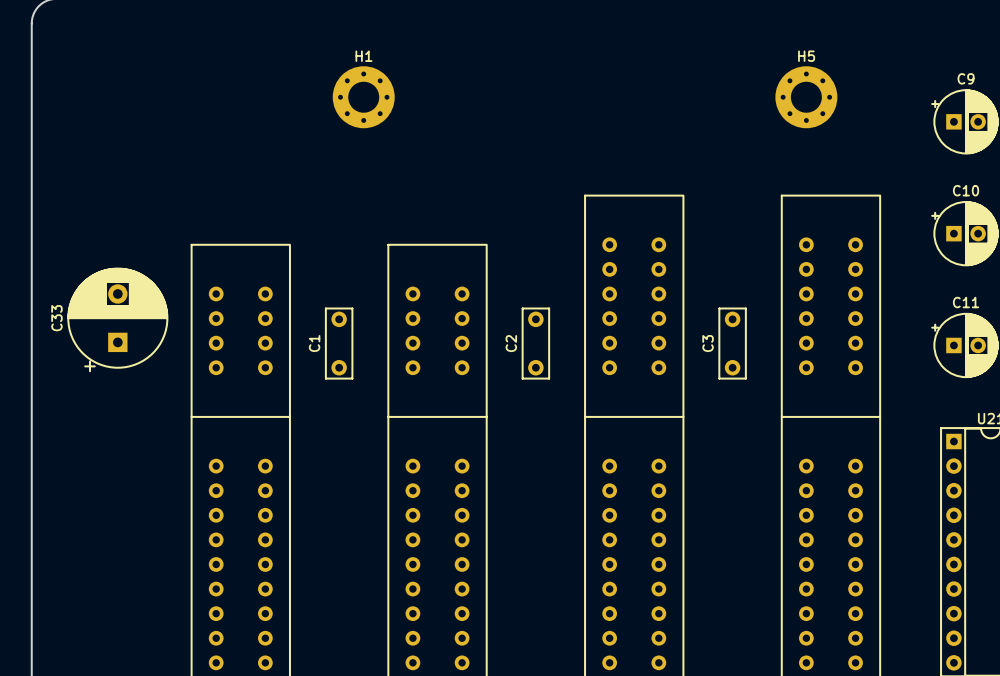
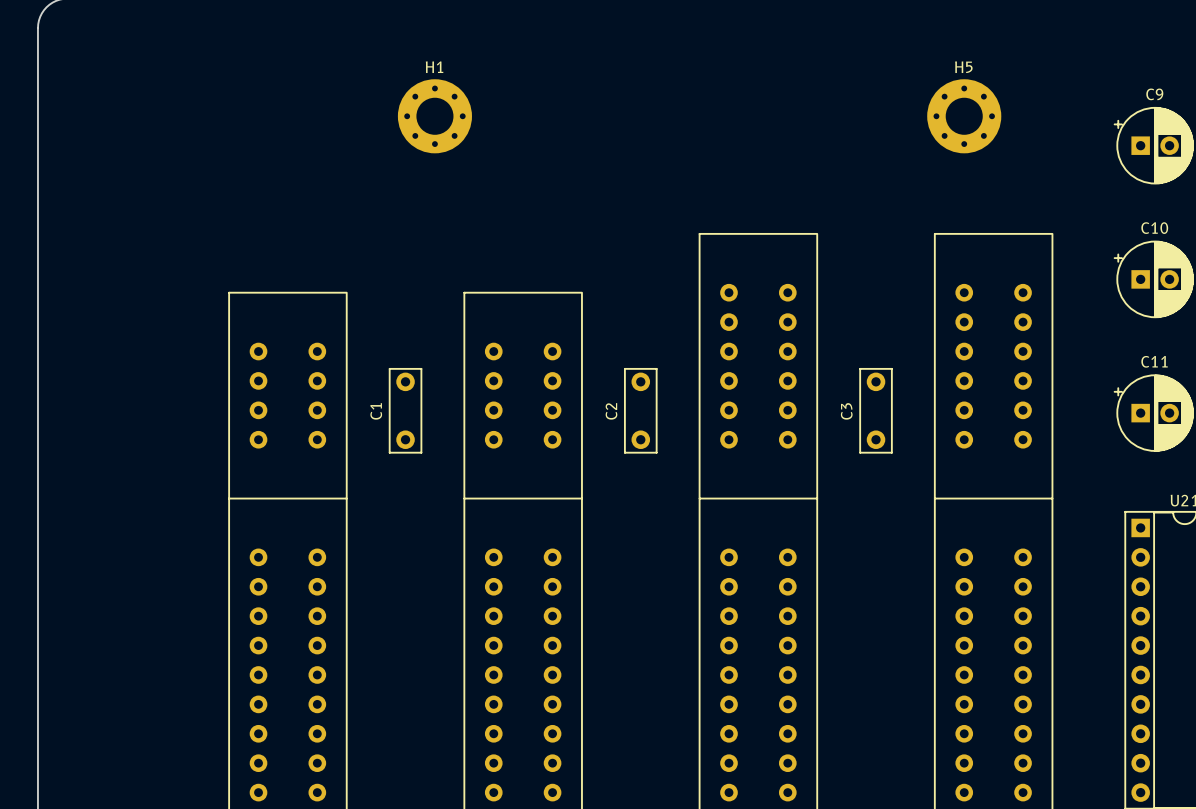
C33: (117, 319) -> none

